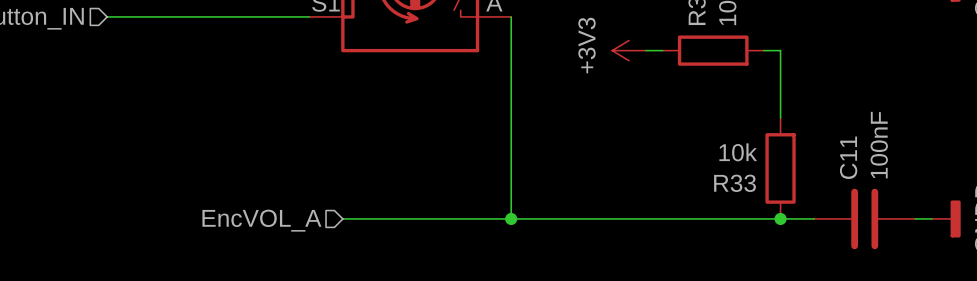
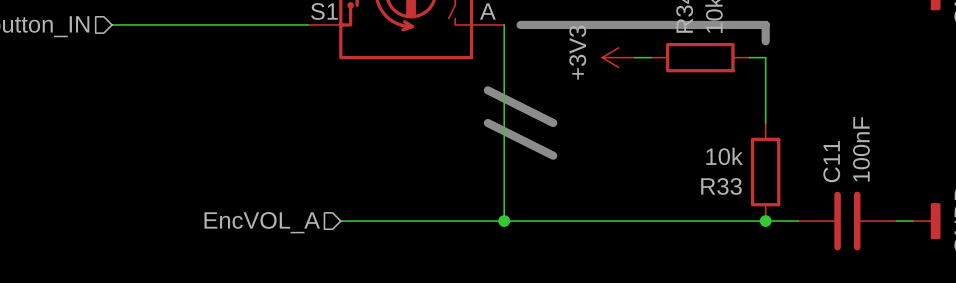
line: none -> (520, 24) (765, 24) (765, 41)
line: none -> (487, 90) (553, 123)
line: none -> (487, 123) (553, 155)

